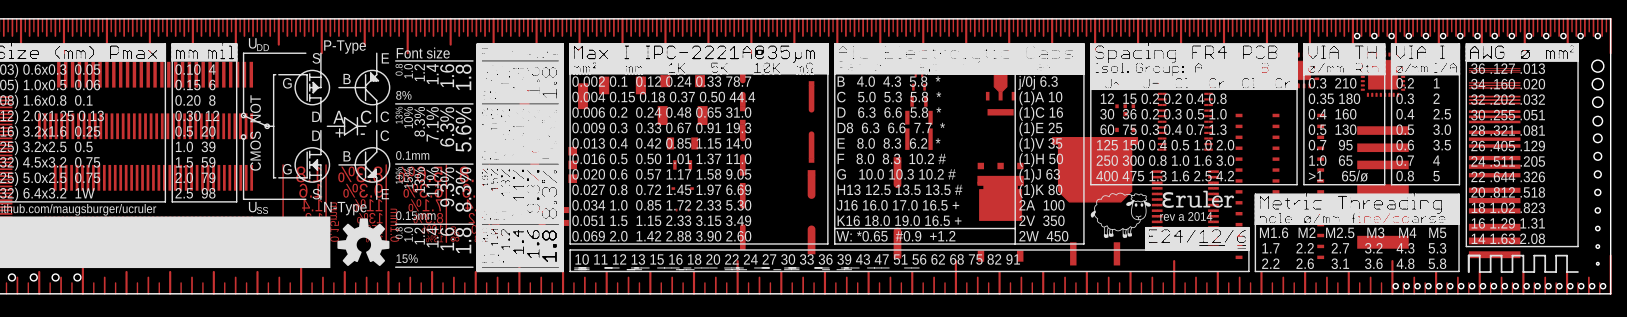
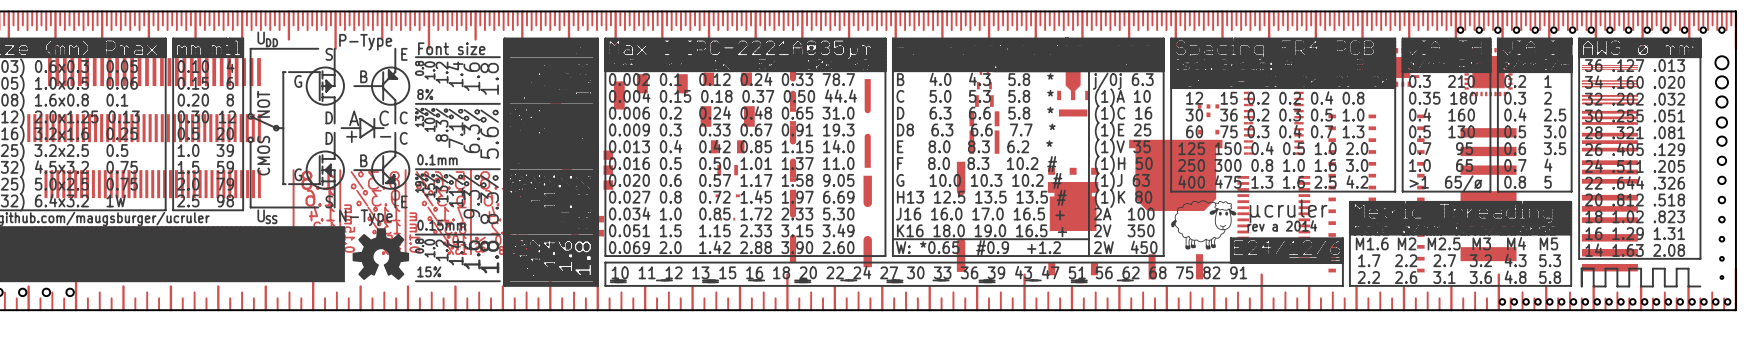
drawing: [1162, 190, 1235, 208] -> none
text: none -> µcruler (1288, 211)

